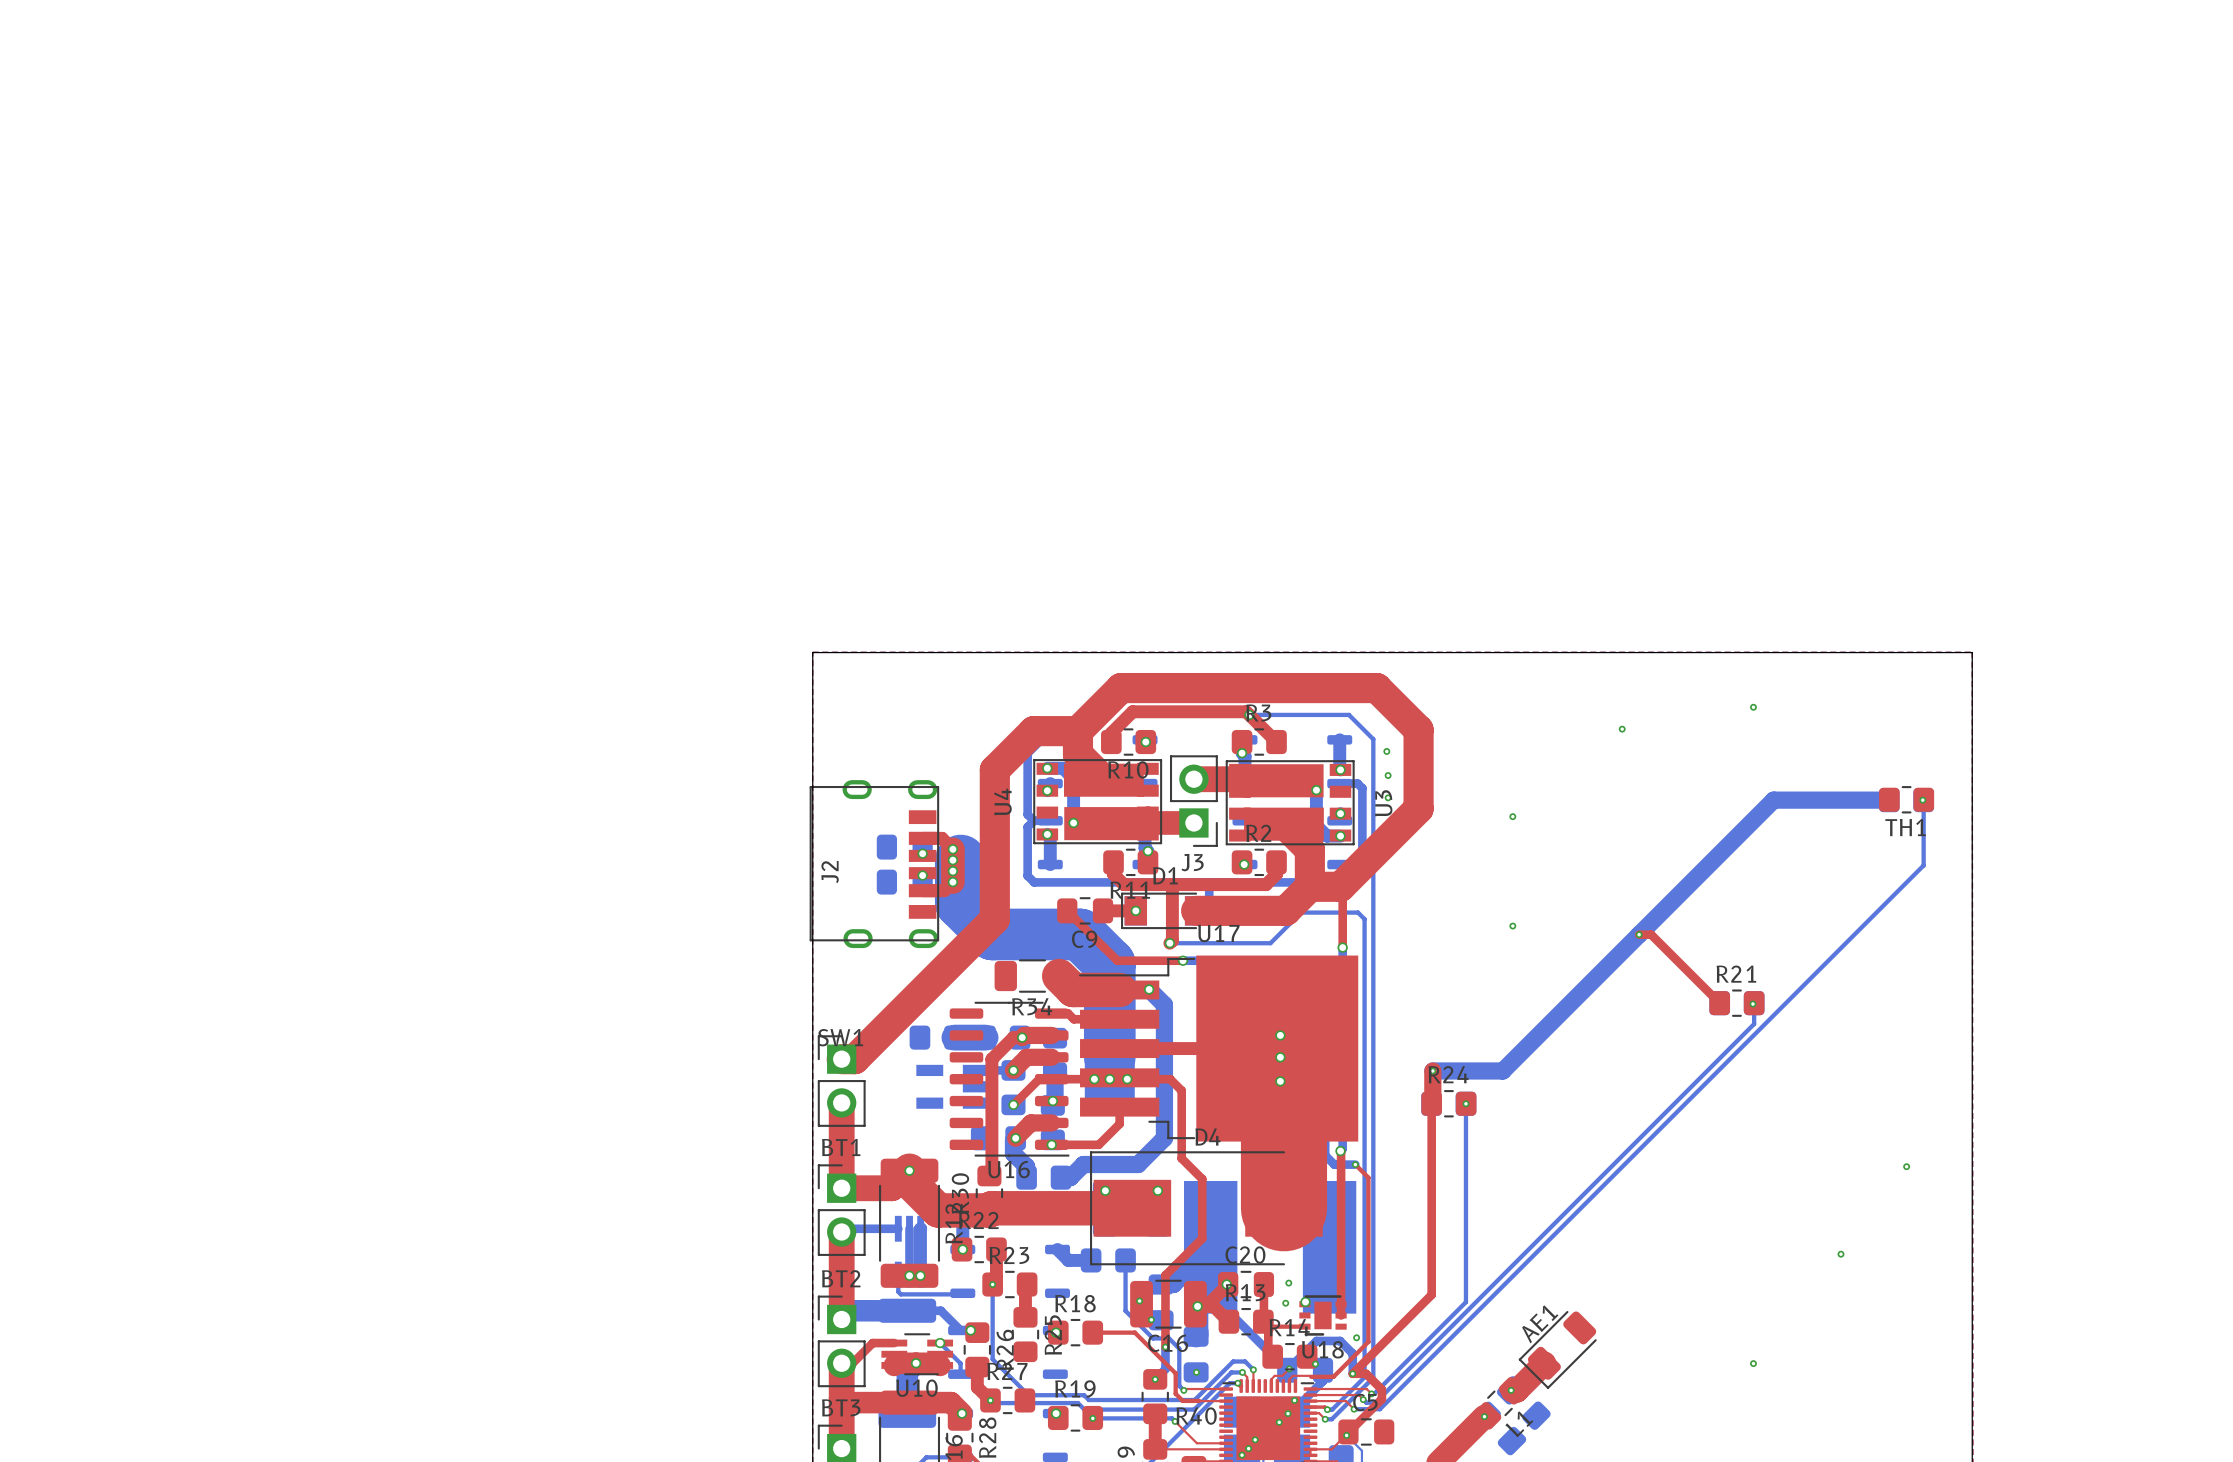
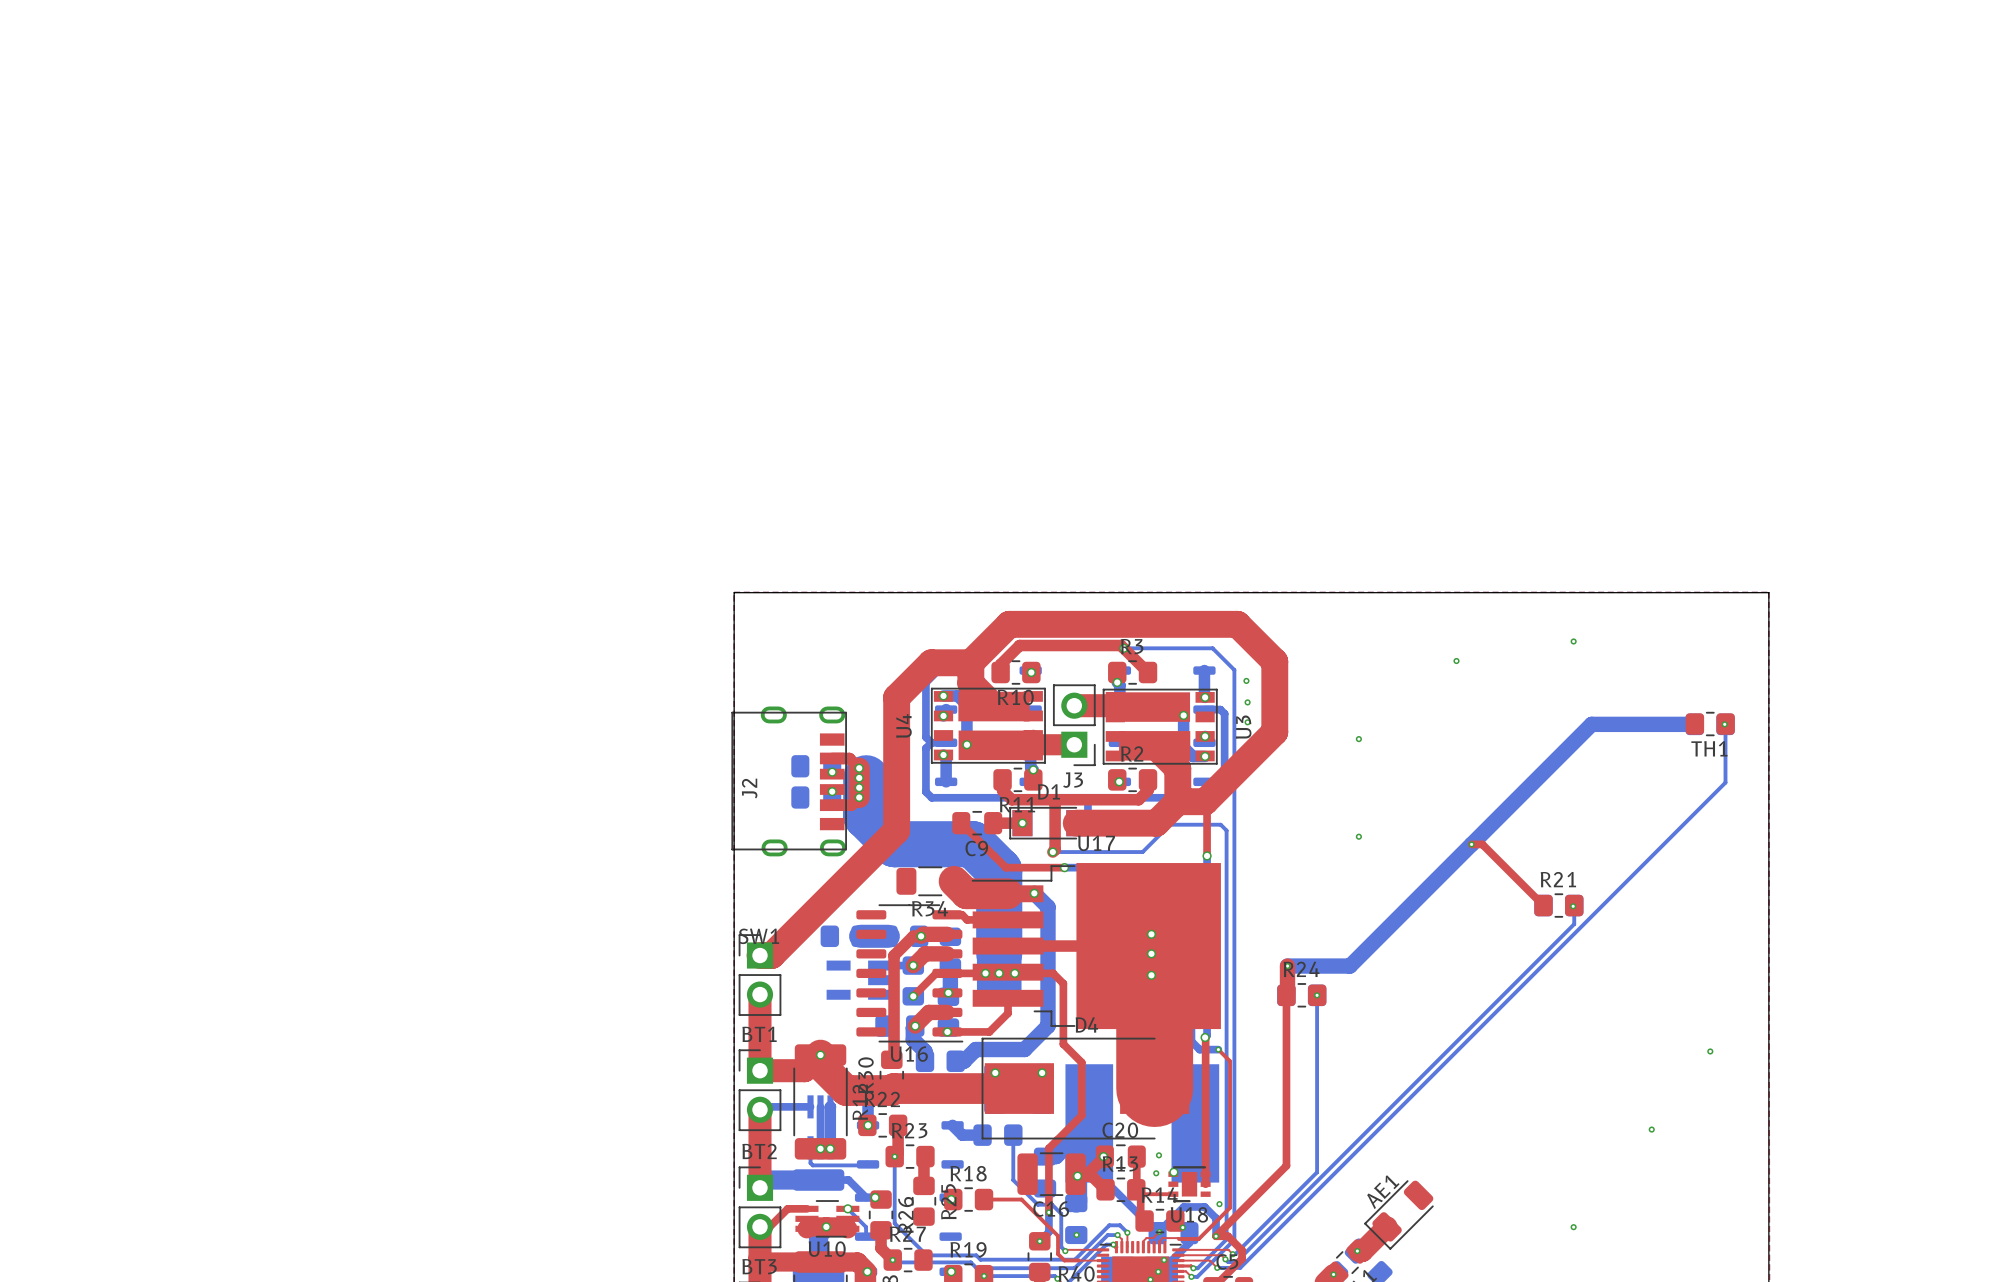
via: (1139, 1301) -> none
via: (1151, 1319) -> none

